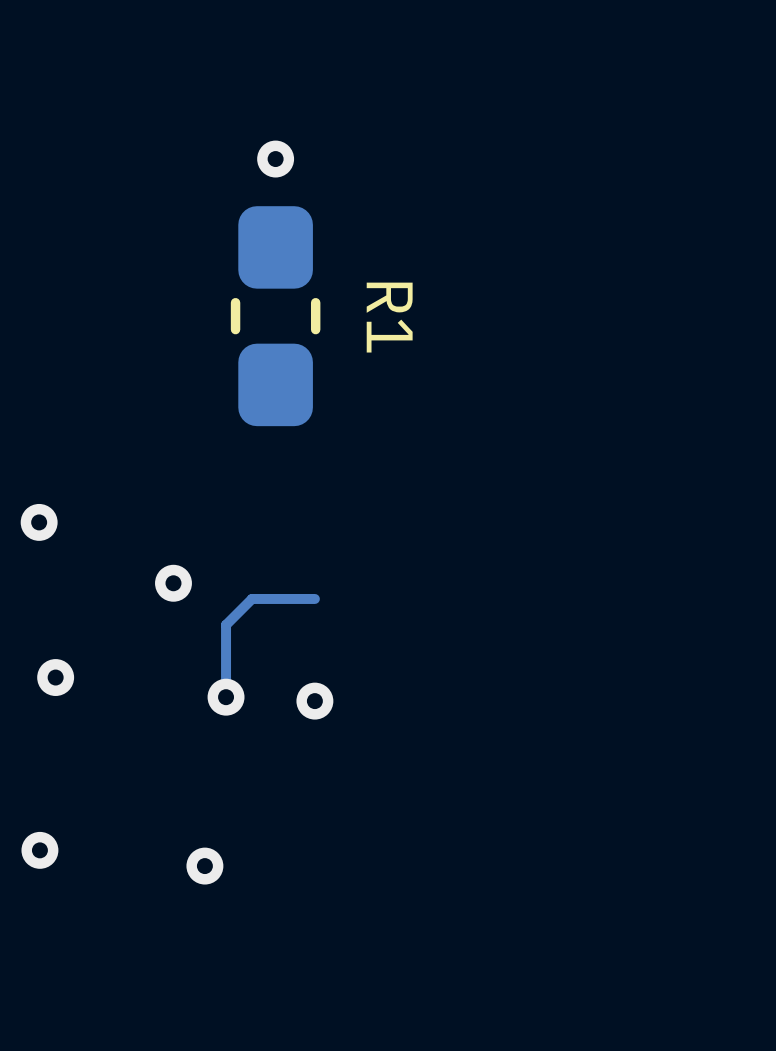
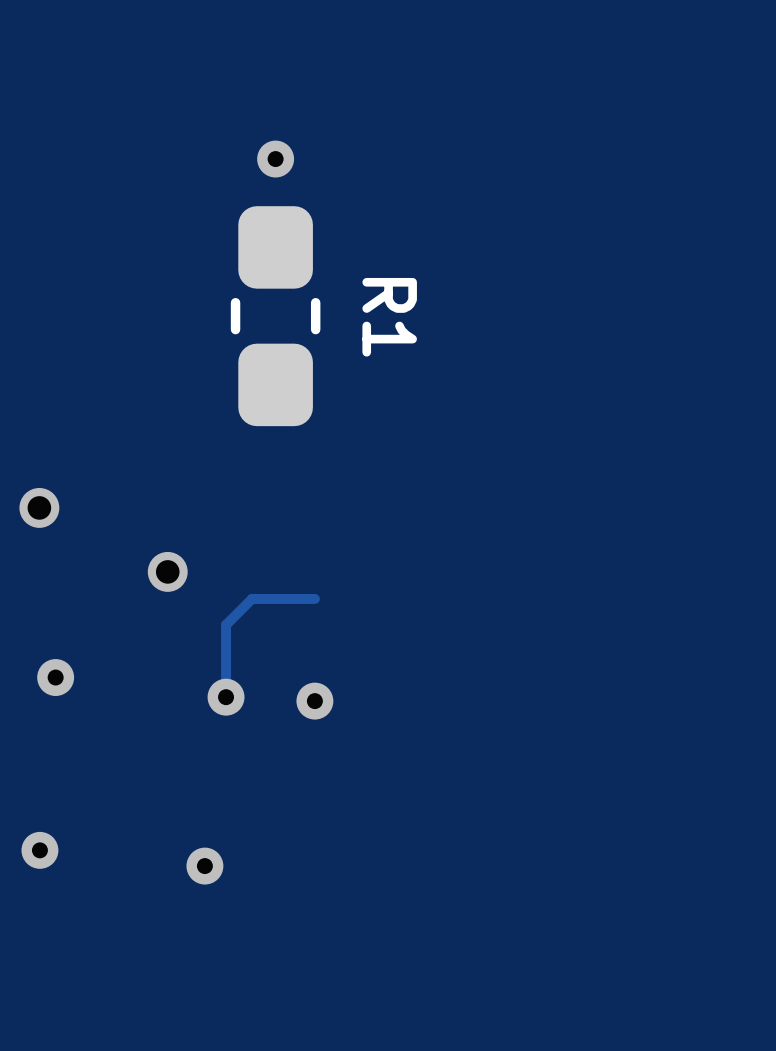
via position: (39, 522) -> (39, 507)
via position: (173, 583) -> (167, 571)

